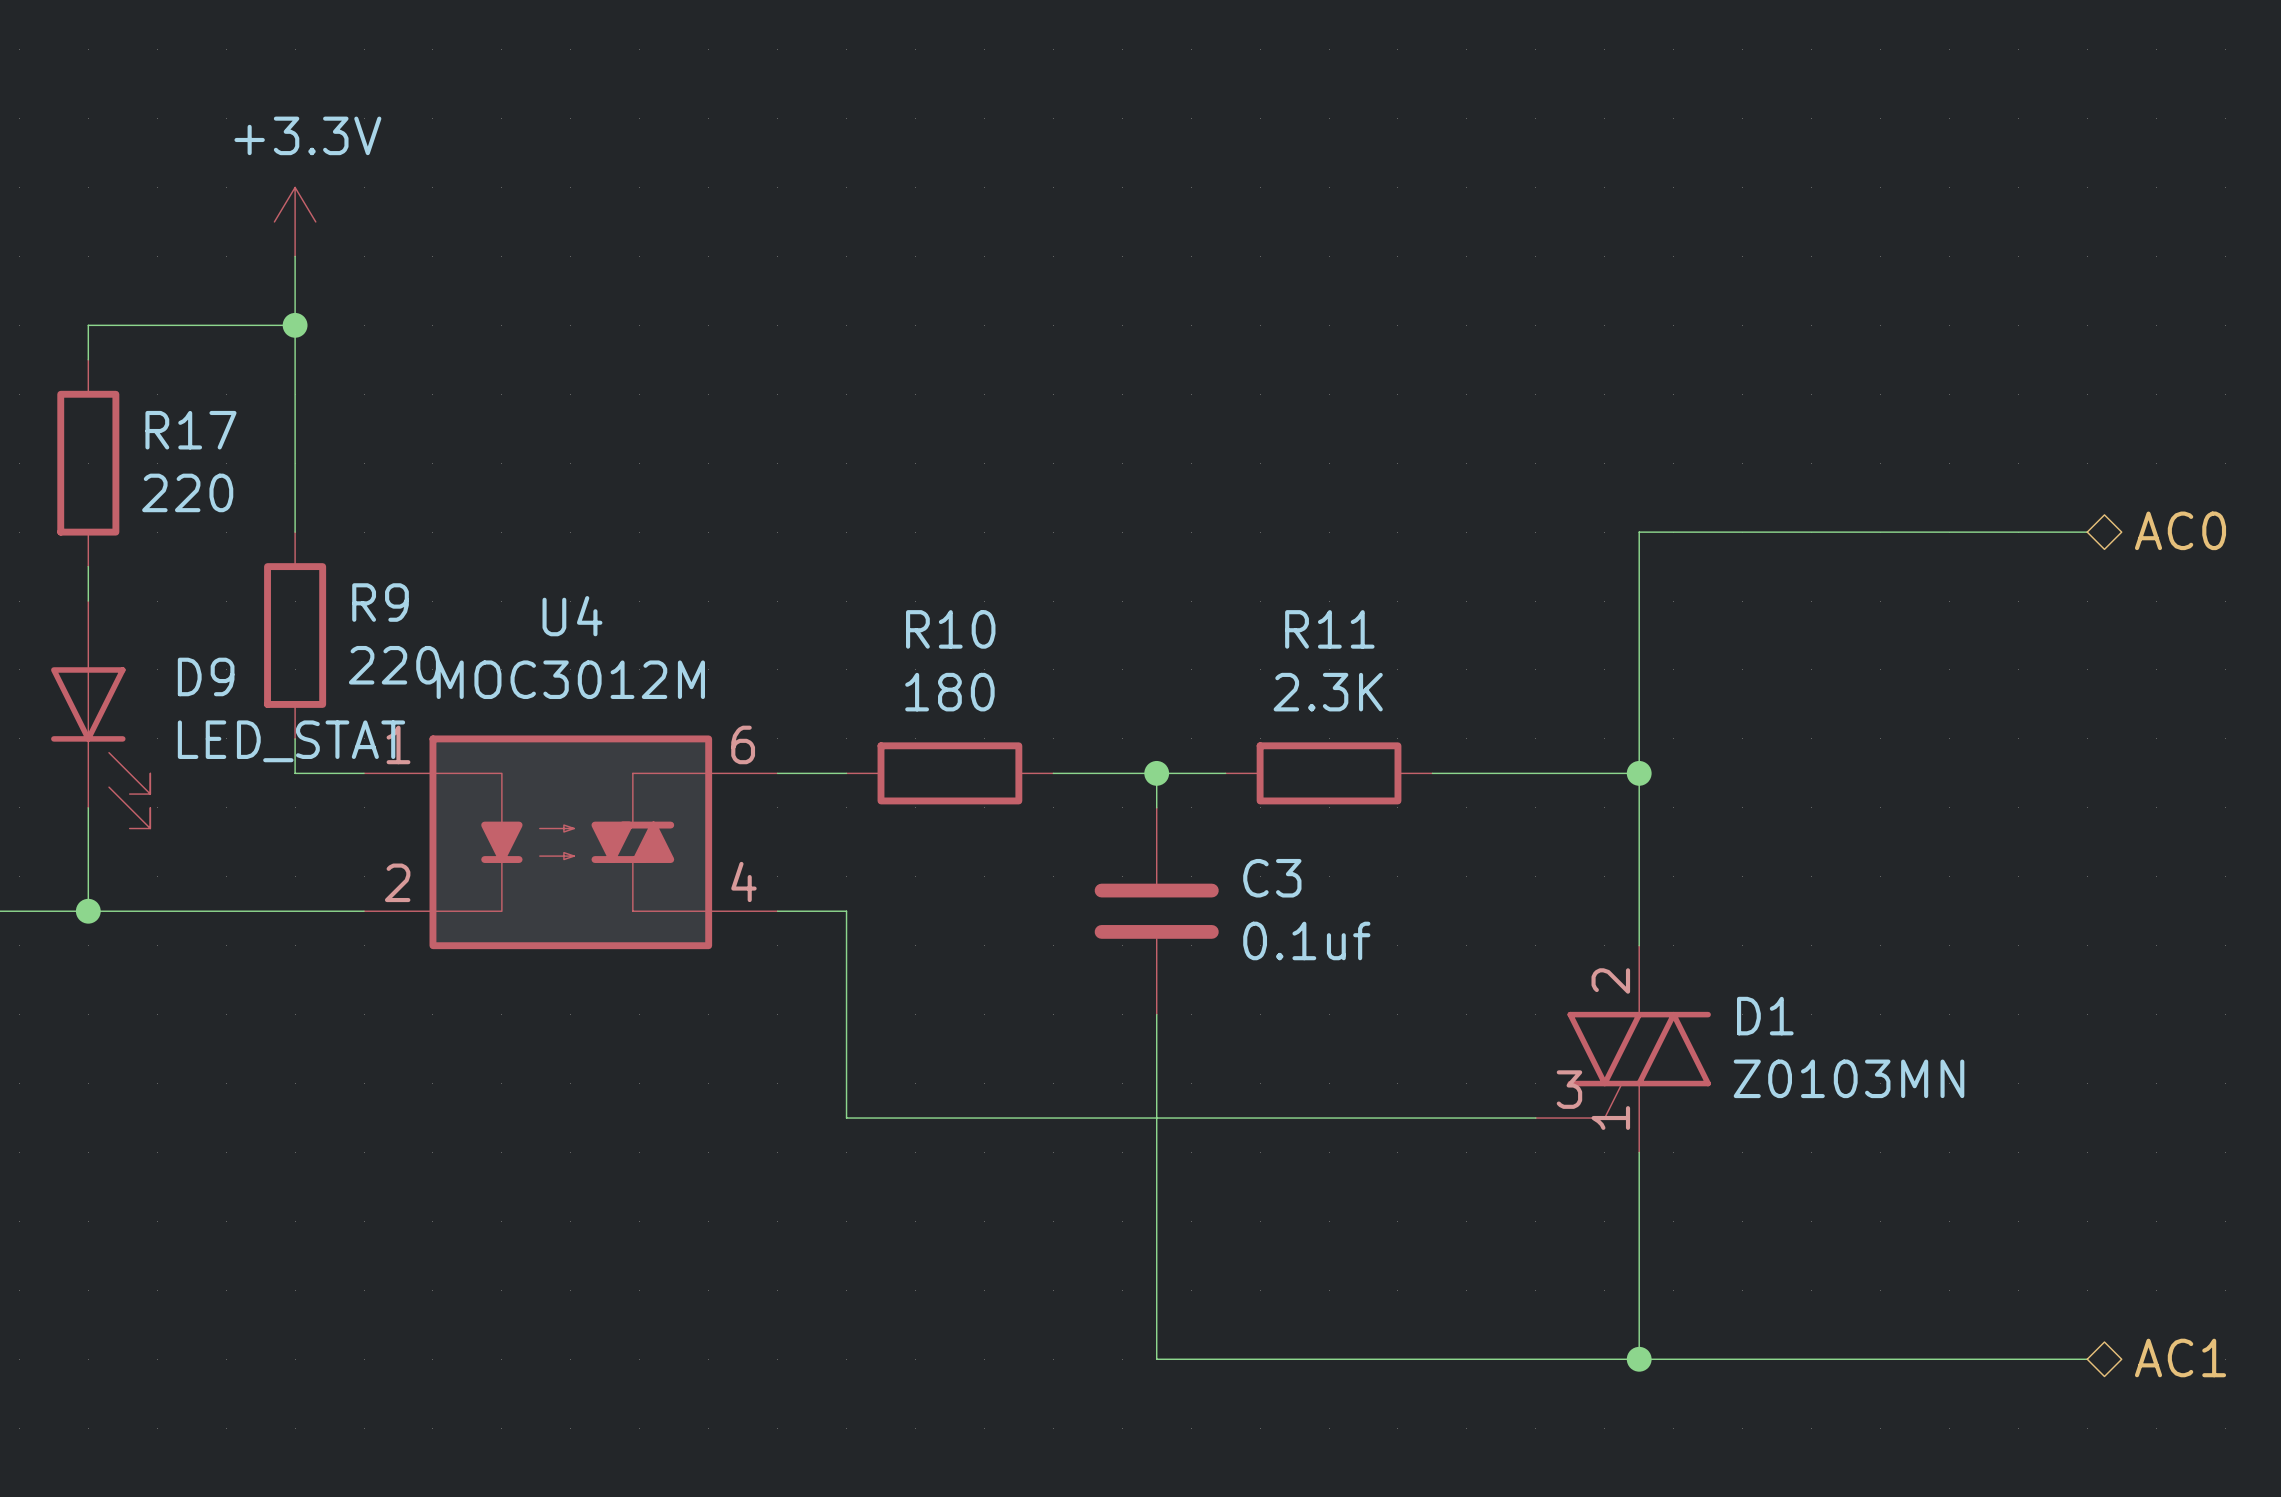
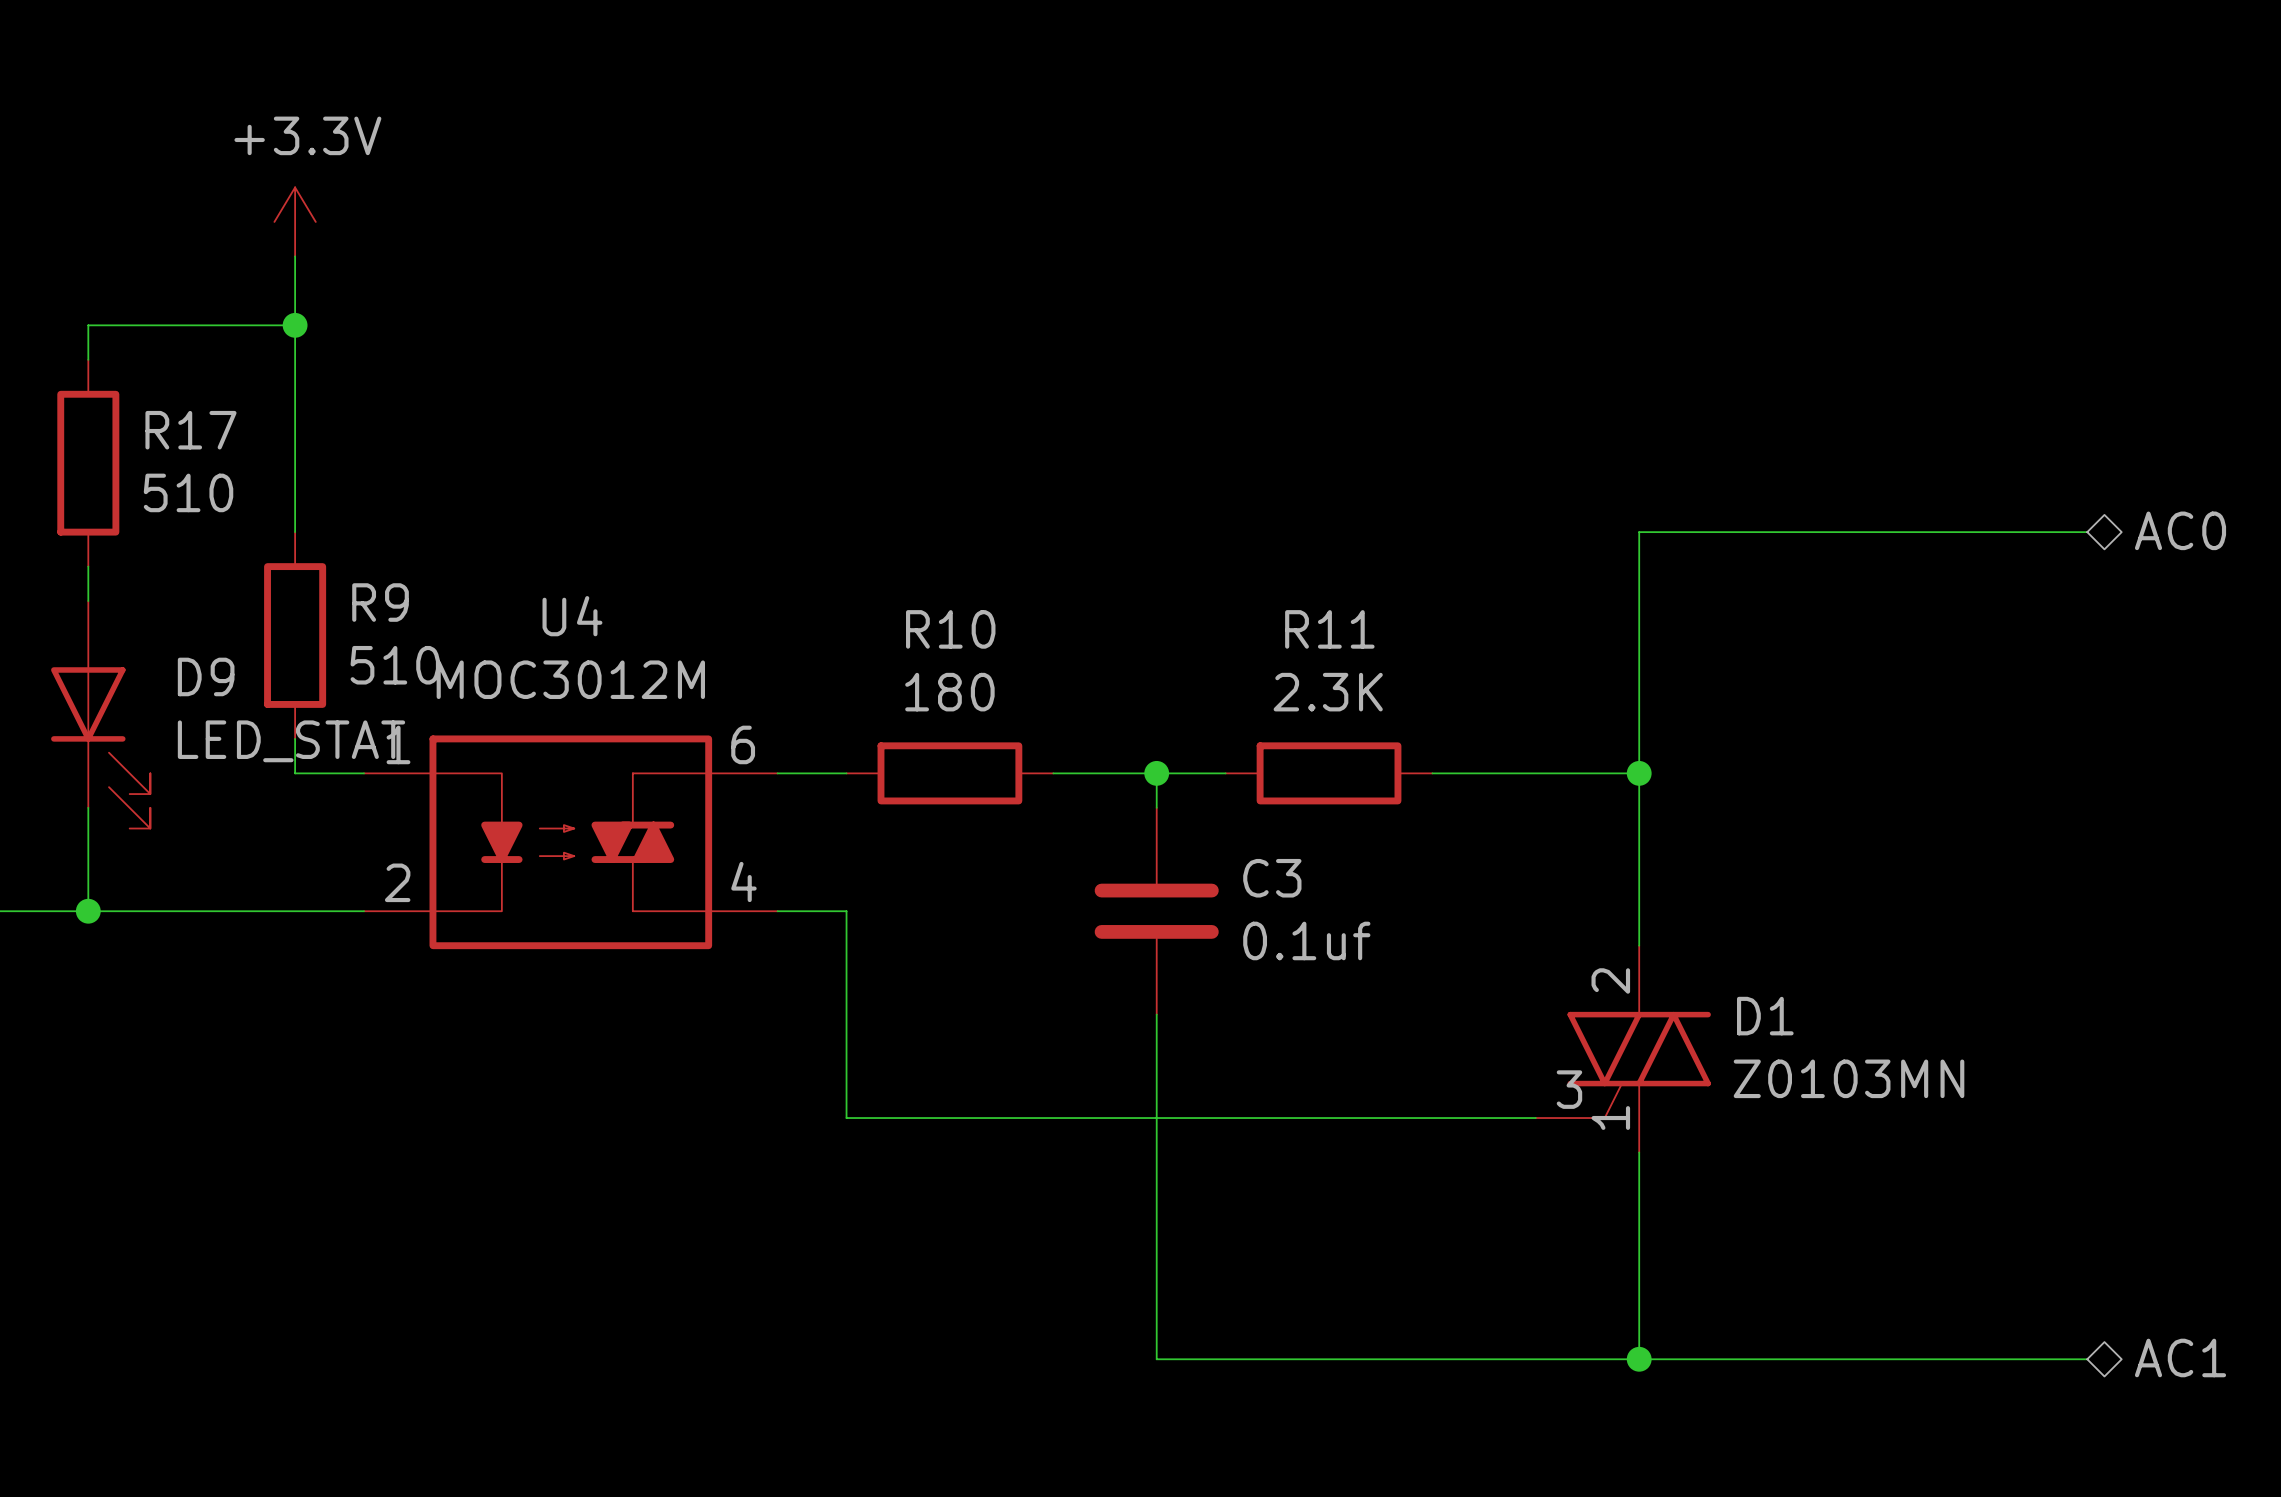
R17 value: 220 (187, 492) -> 510 (188, 492)
R9 value: 220 (394, 665) -> 510 (395, 665)

